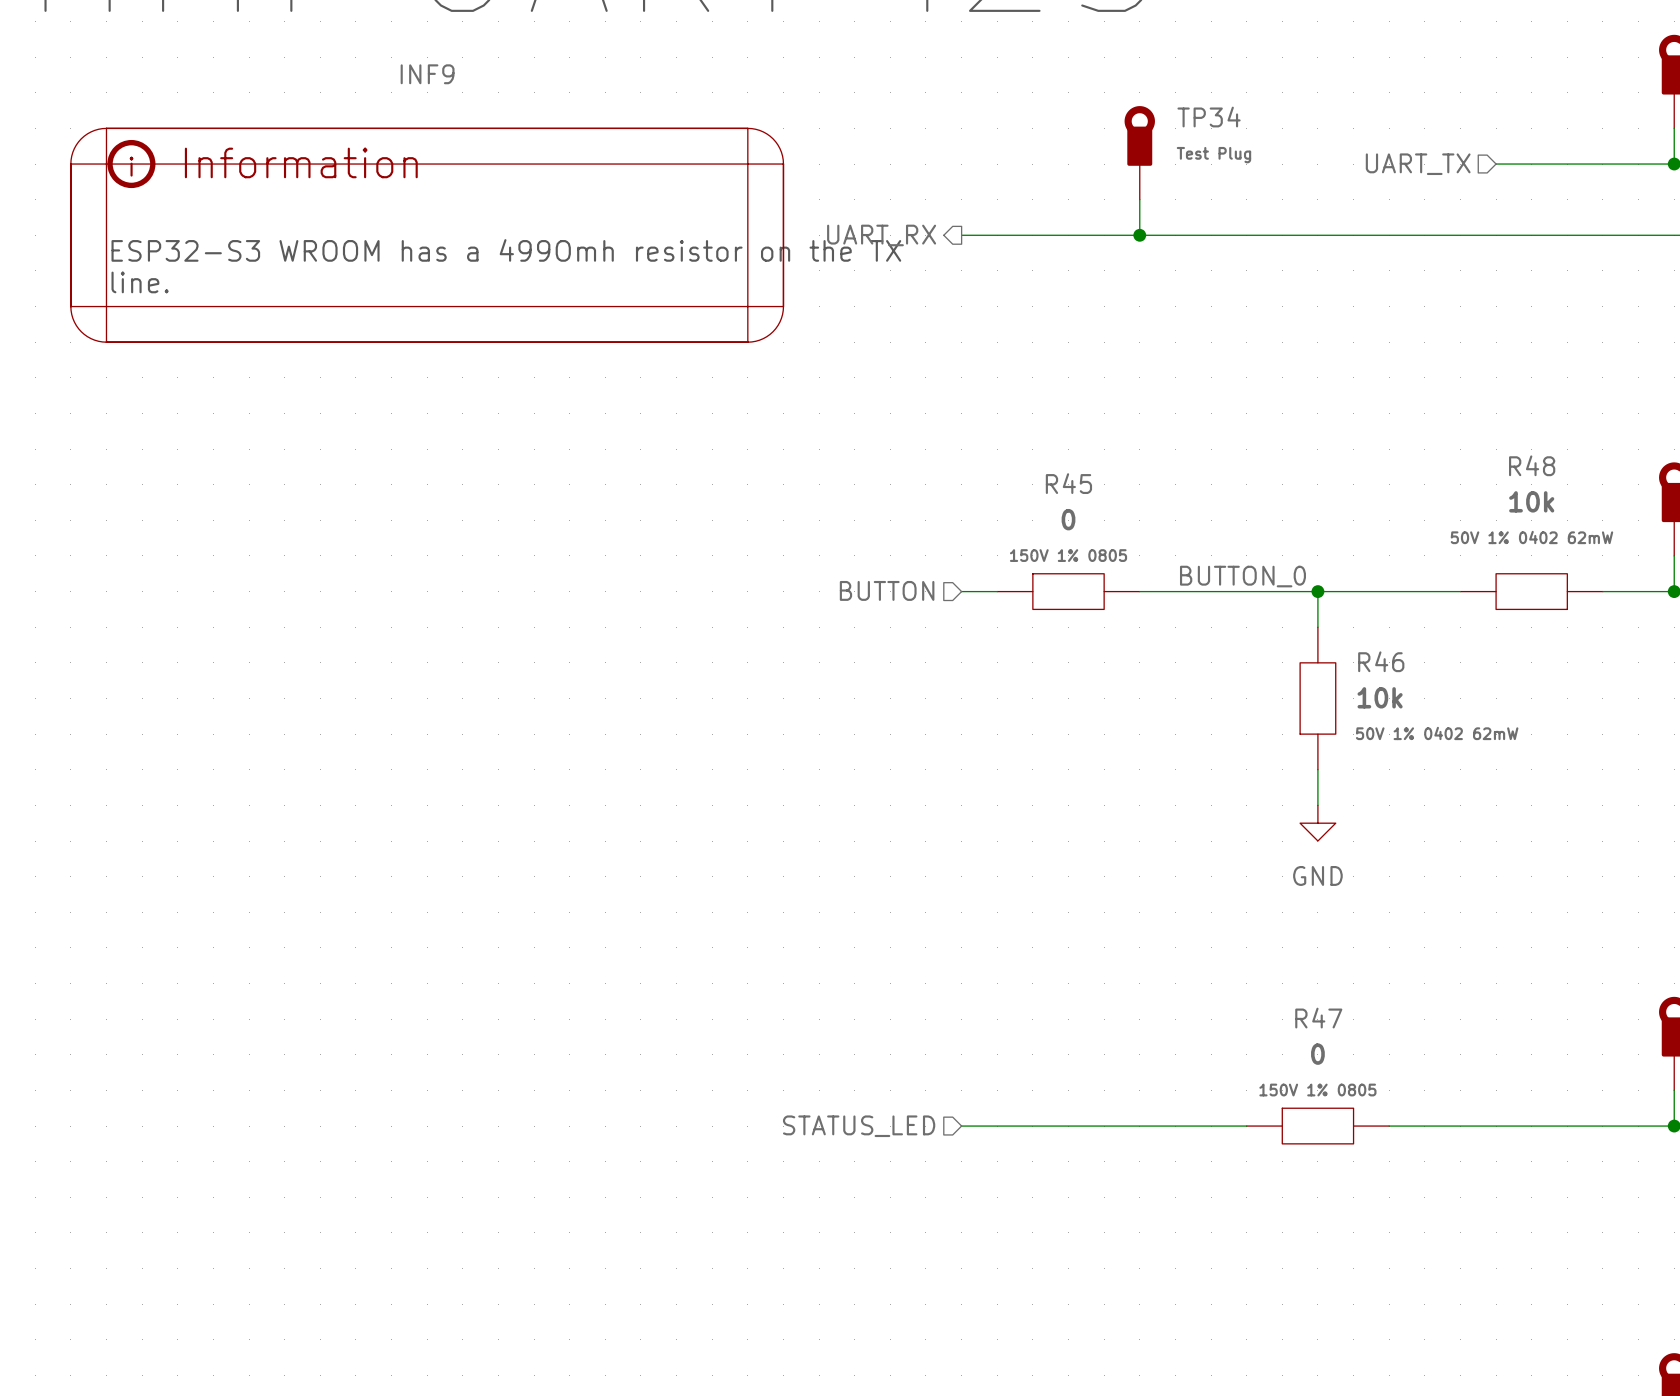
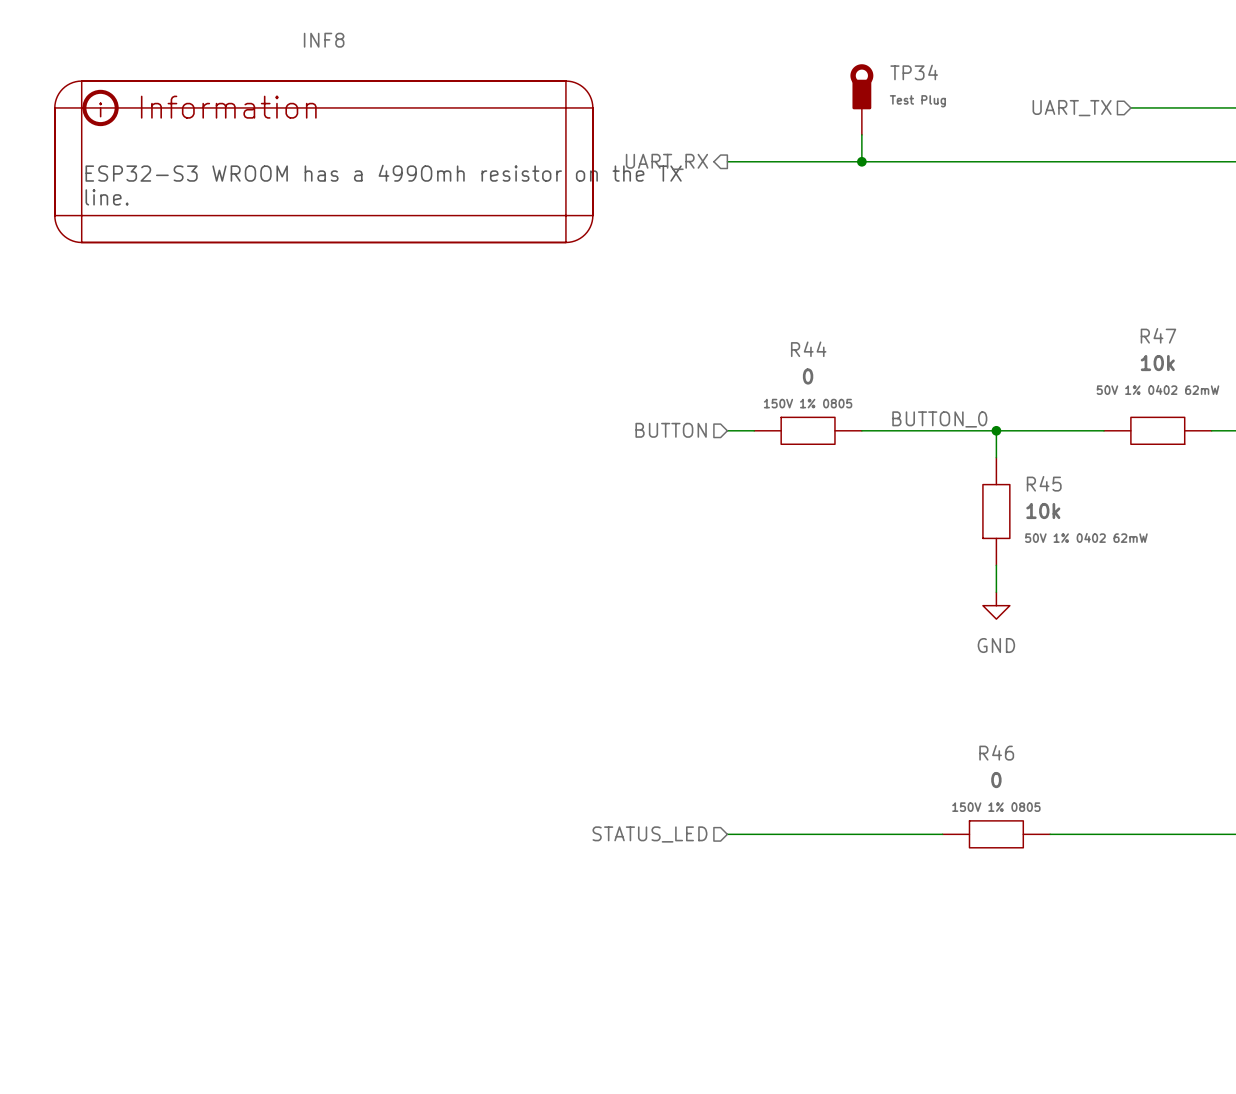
INF9 name: INF9 (427, 74) -> INF8 (324, 40)
R48 name: R48 (1532, 465) -> R47 (1158, 335)
R45 name: R45 (1068, 483) -> R44 (808, 349)
R46 name: R46 (1381, 661) -> R45 (1044, 483)
R47 name: R47 (1318, 1018) -> R46 (996, 752)

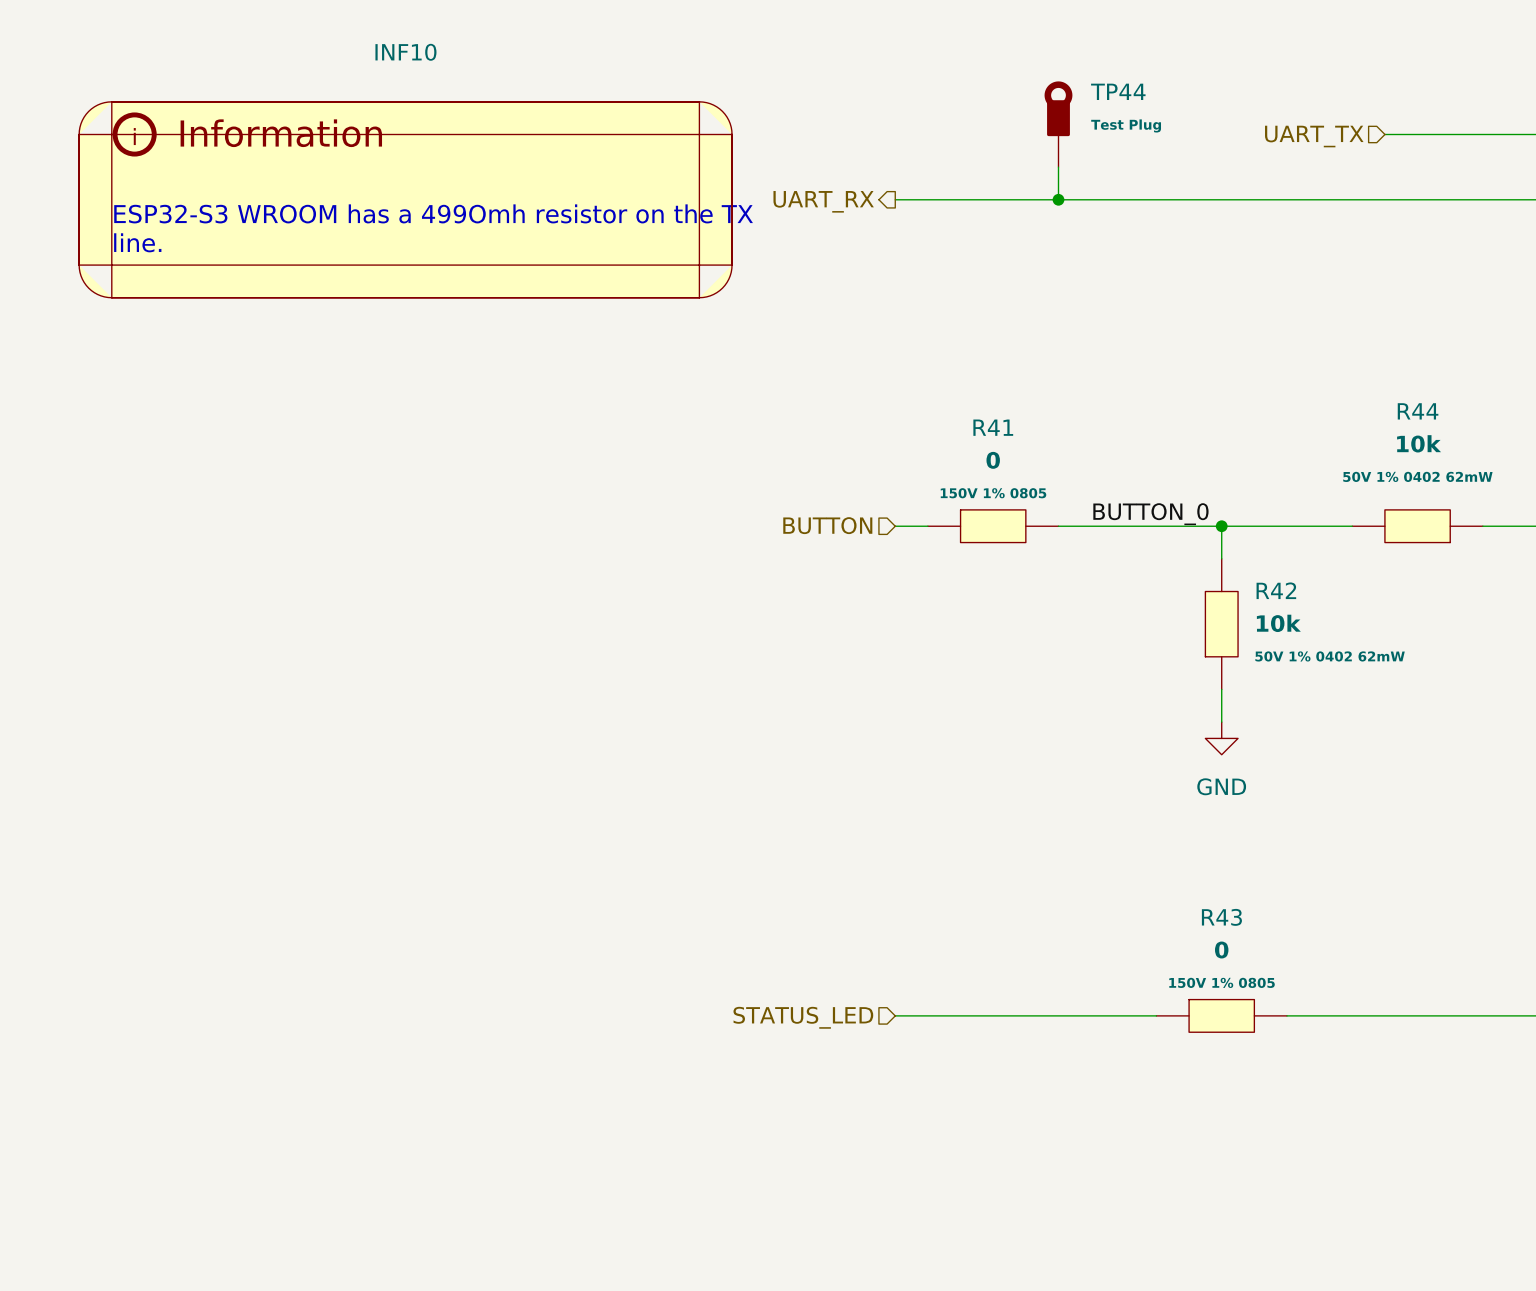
INF8 name: INF8 (324, 40) -> INF10 (405, 52)
TP34 name: TP34 (914, 72) -> TP44 (1118, 91)
R47 name: R47 (1158, 335) -> R44 (1418, 411)
R44 name: R44 (808, 349) -> R41 (993, 427)
R45 name: R45 (1044, 483) -> R42 (1276, 590)
R46 name: R46 (996, 752) -> R43 (1221, 917)

